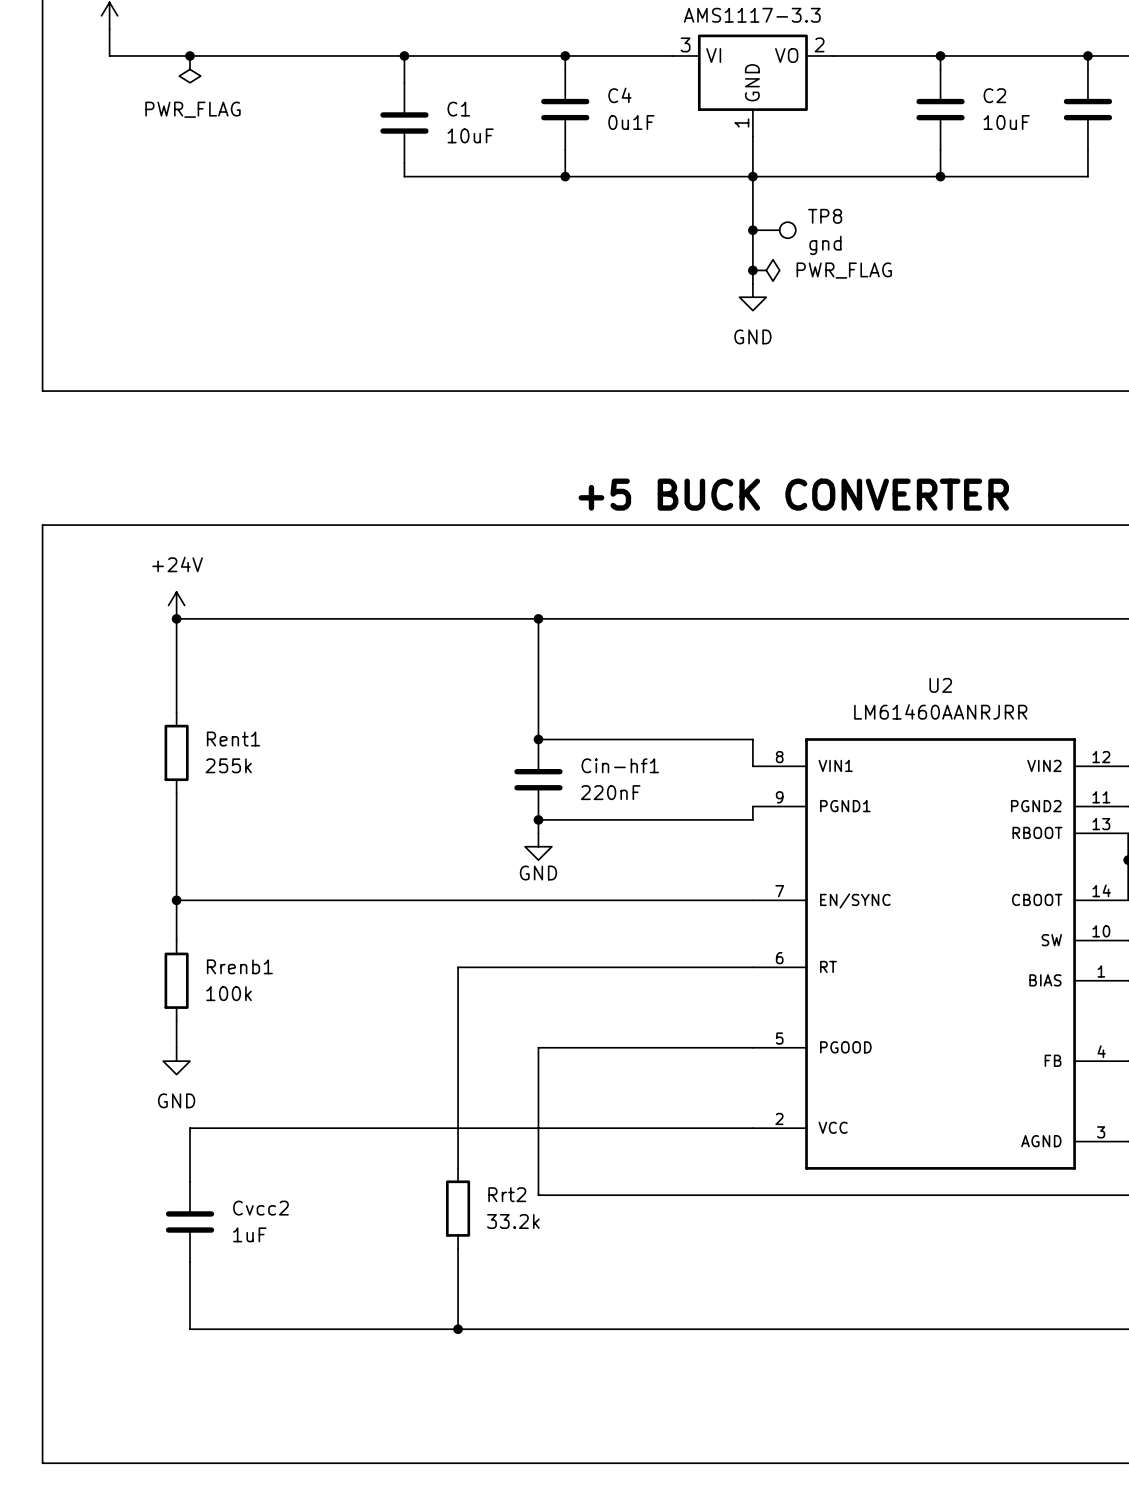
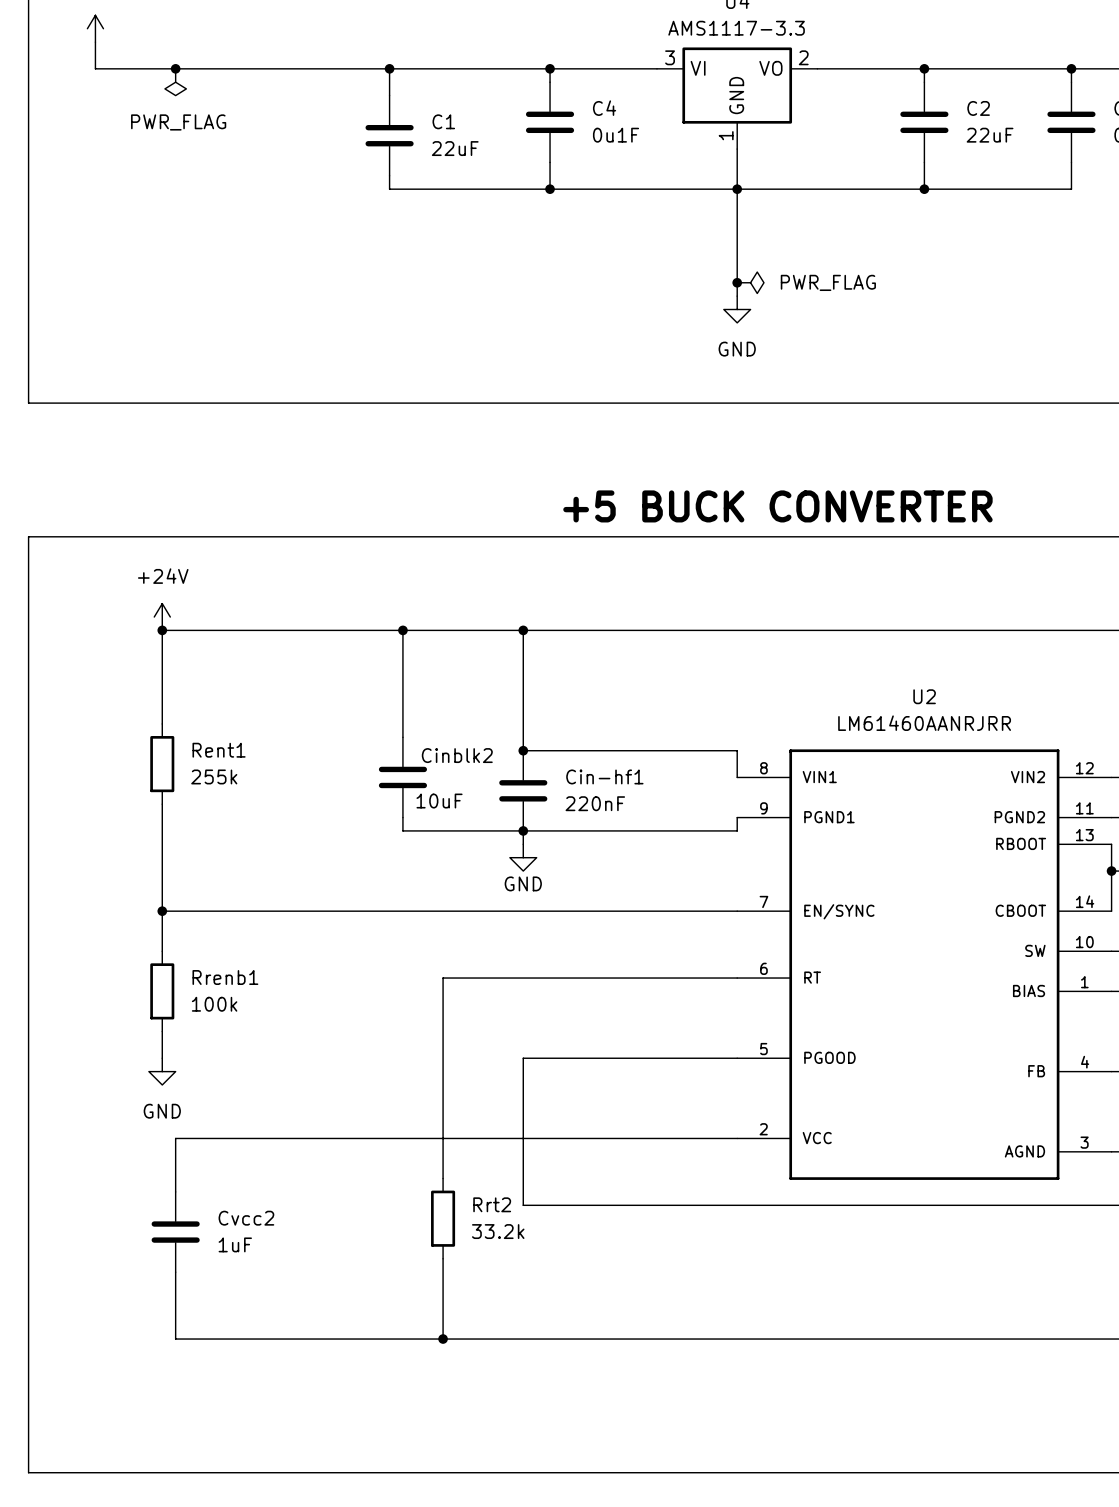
C2 value: 10uF (1006, 122) -> 22uF (990, 135)
C1 value: 10uF (470, 135) -> 22uF (455, 148)
junction: (752, 230) -> none
TP8: gnd (774, 230) -> none
wire: none -> (402, 630) (402, 737)
junction: none -> (402, 630)
Cinblk2: none -> 10uF (402, 777)
wire: none -> (402, 817) (402, 830) (523, 830)

